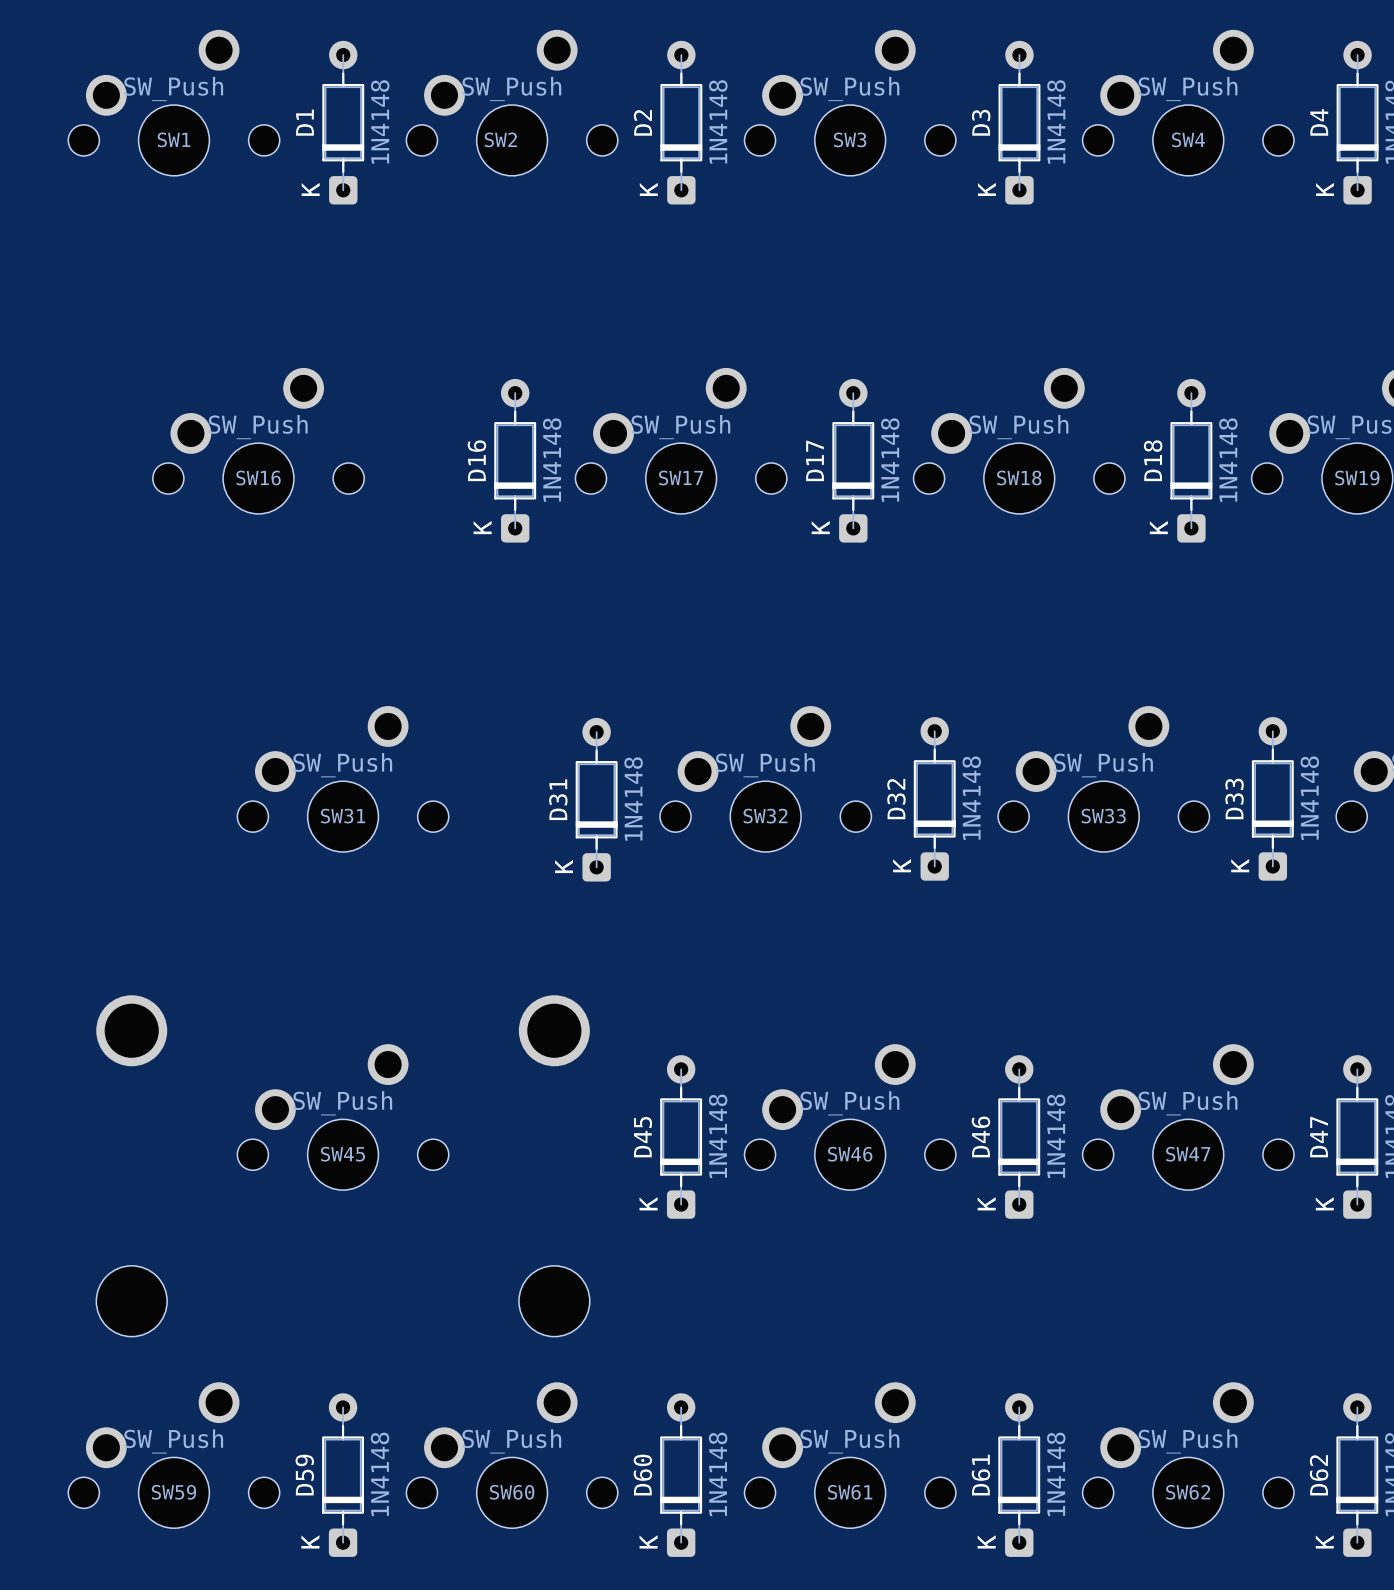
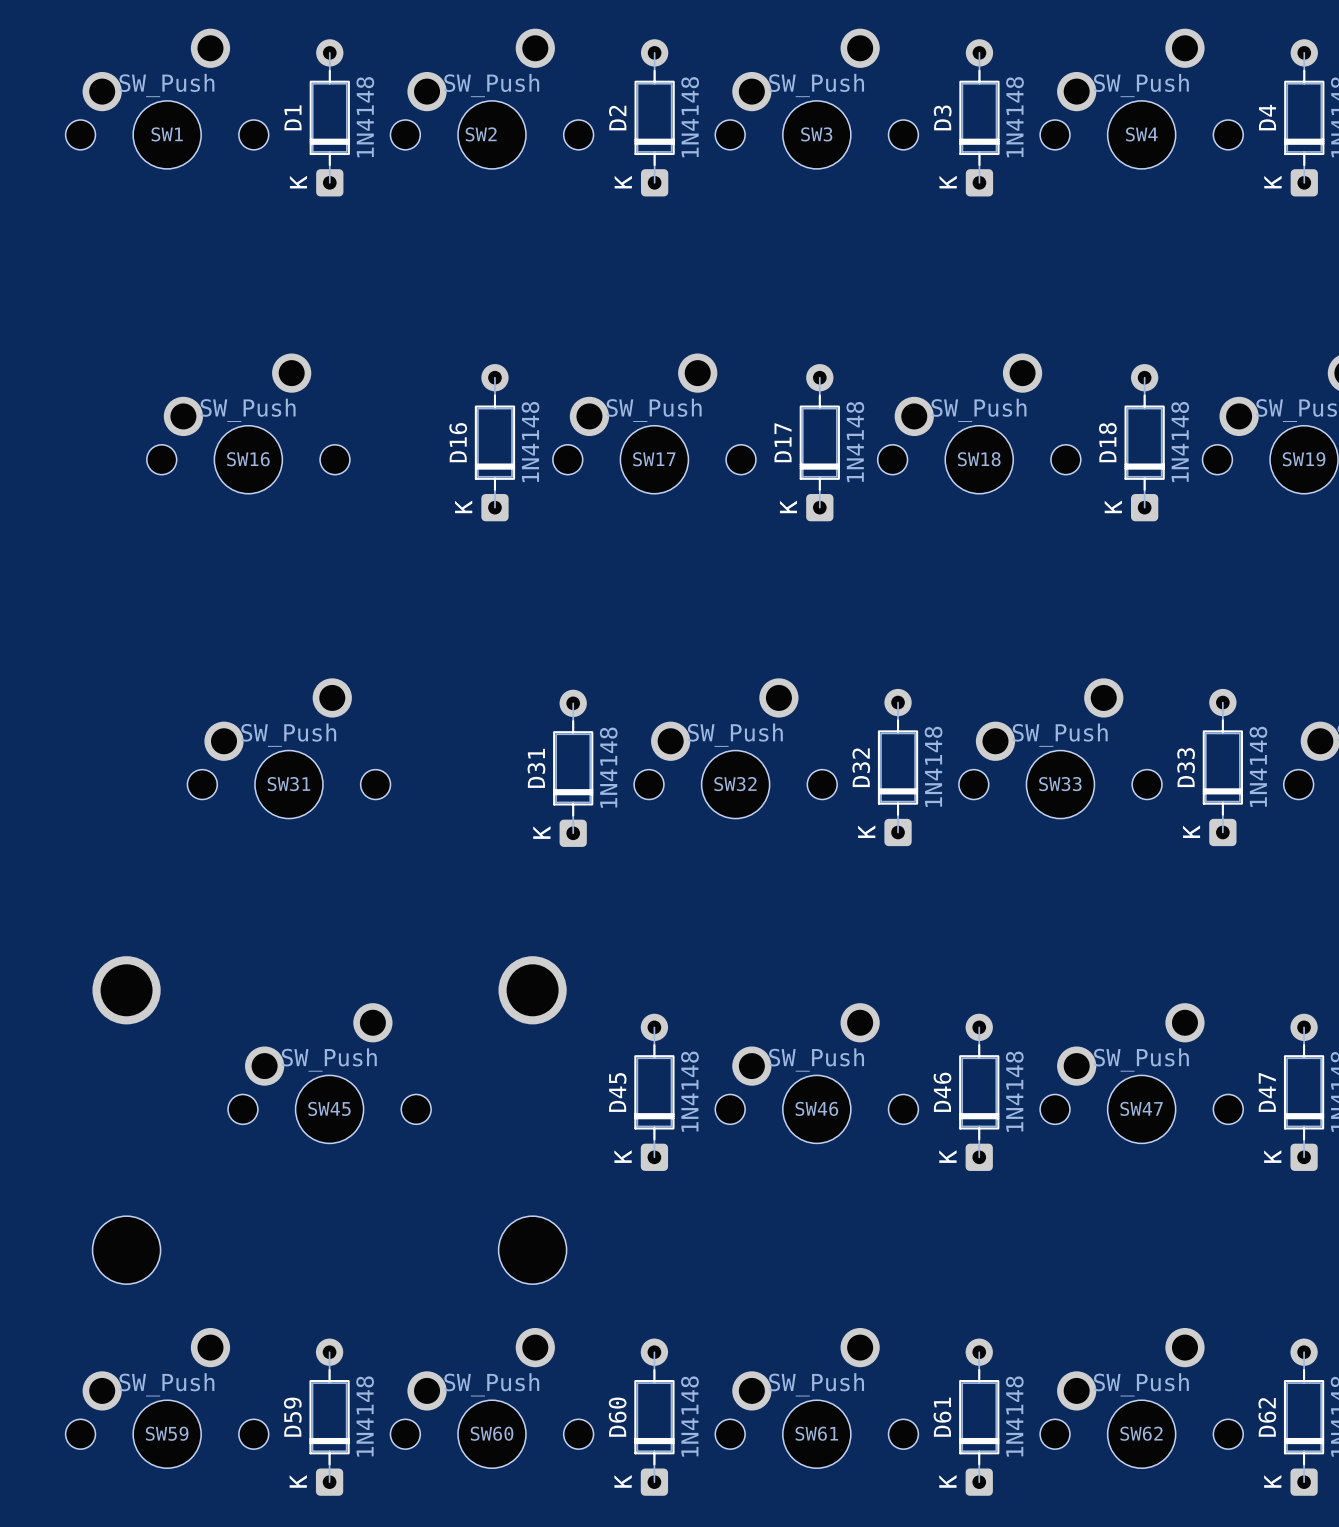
SW31 position: (343, 779) -> (288, 748)

